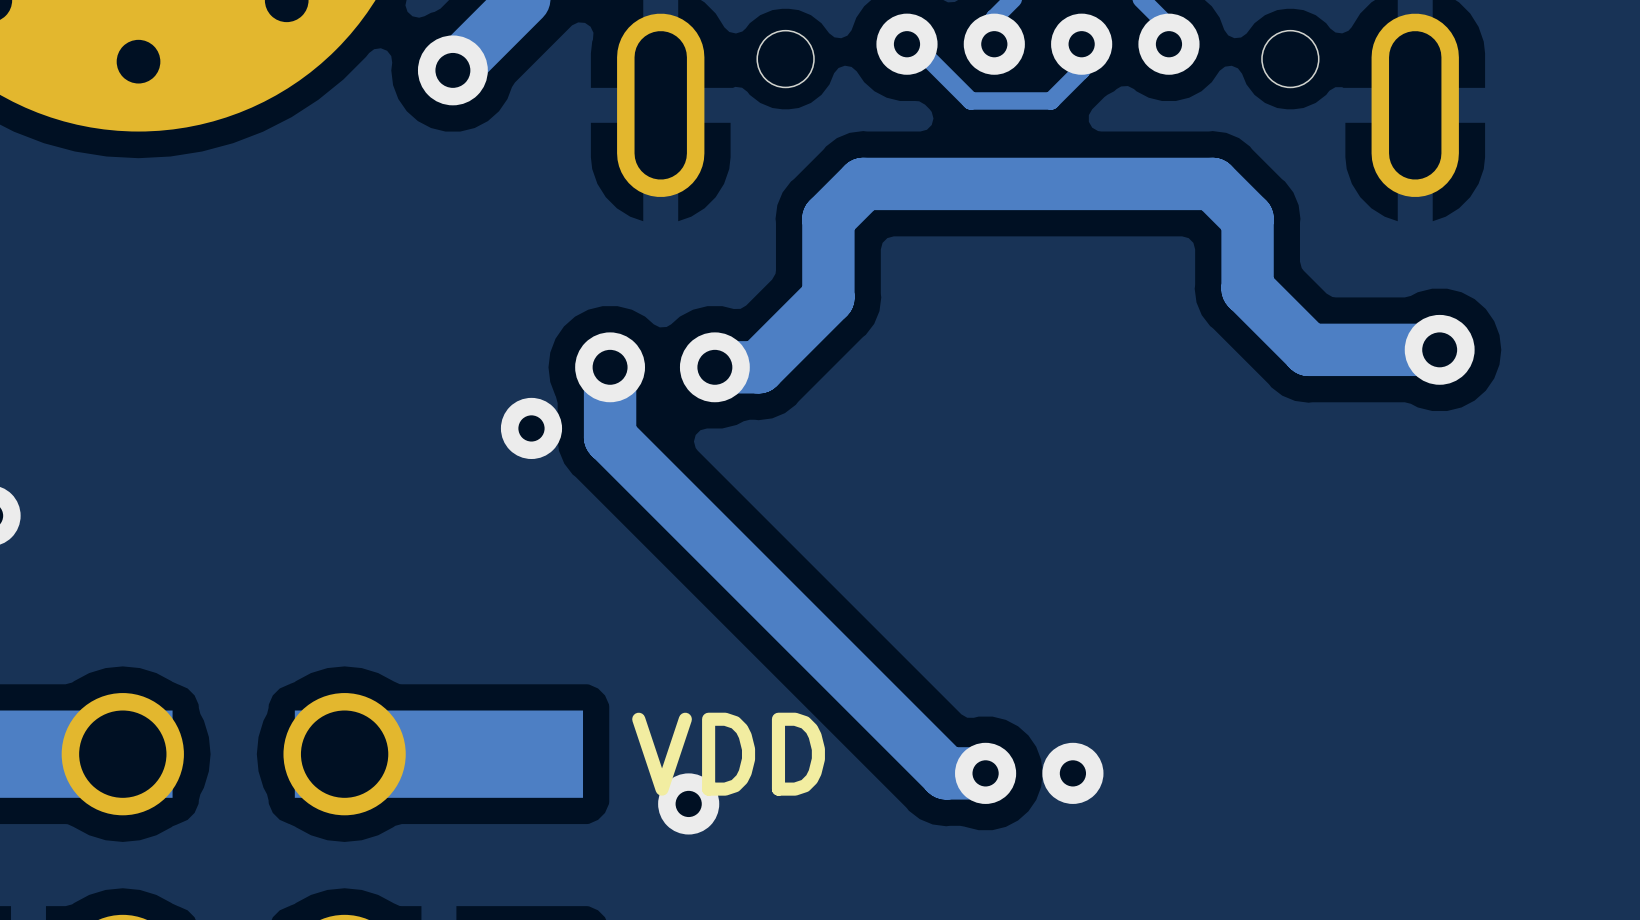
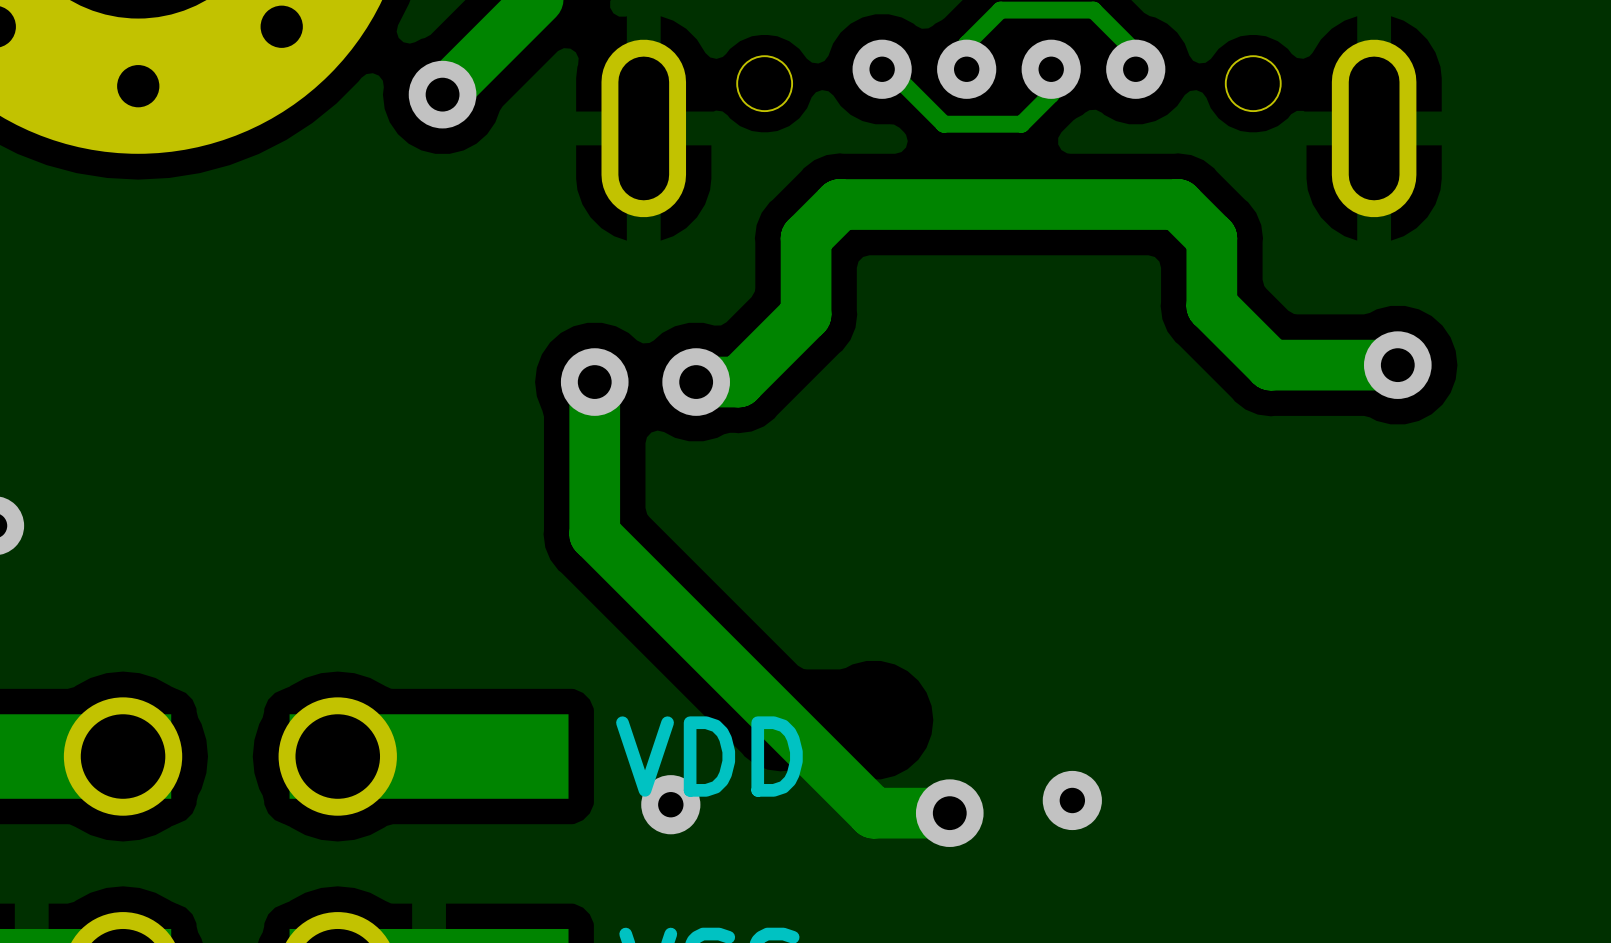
via: (531, 428) -> none
track: (610, 437) (946, 773) (985, 773) -> (594, 449) (594, 534) (873, 813) (949, 813)
via position: (985, 773) -> (949, 813)
via position: (1072, 773) -> (1072, 800)

